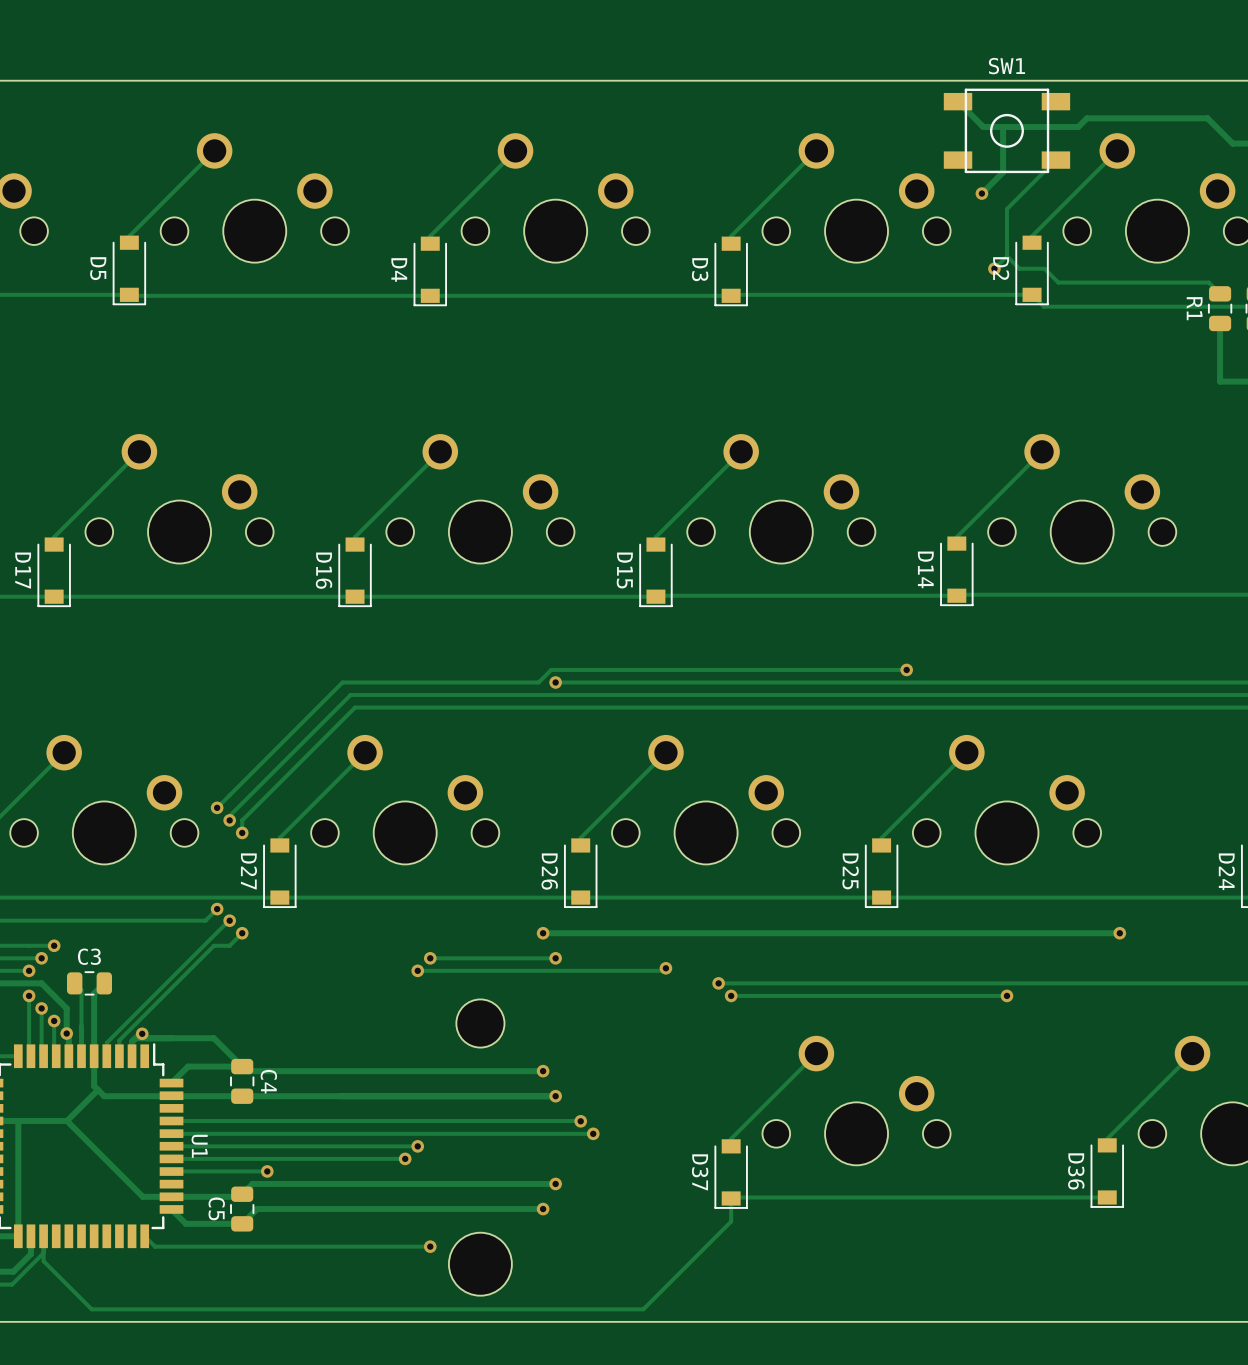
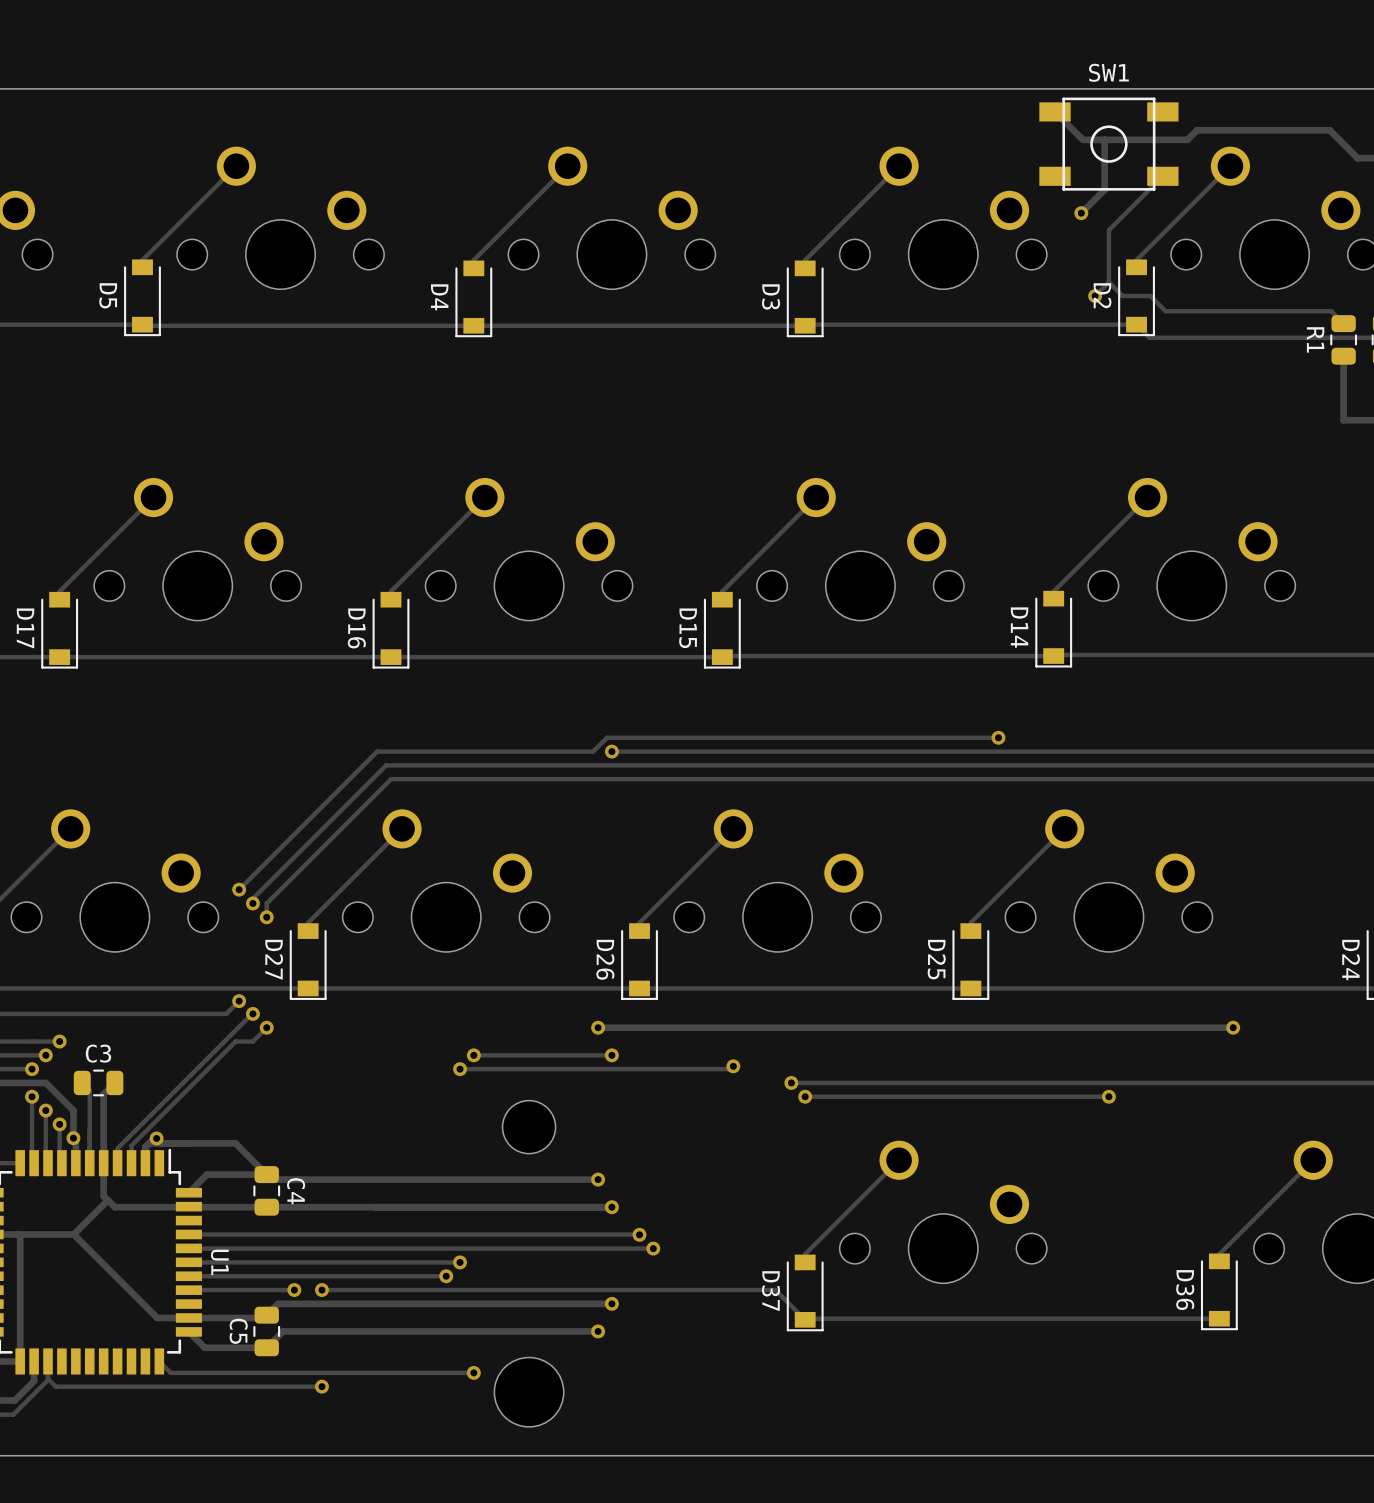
via: none -> (321, 1290)
track: (731, 1198) (731, 1221) (643, 1309) (91, 1309) (43, 1261) (43, 1253) -> (805, 1319) (775, 1290) (321, 1290)
track: none -> (48, 1378) (55, 1386) (321, 1386)
via: none -> (321, 1386)

